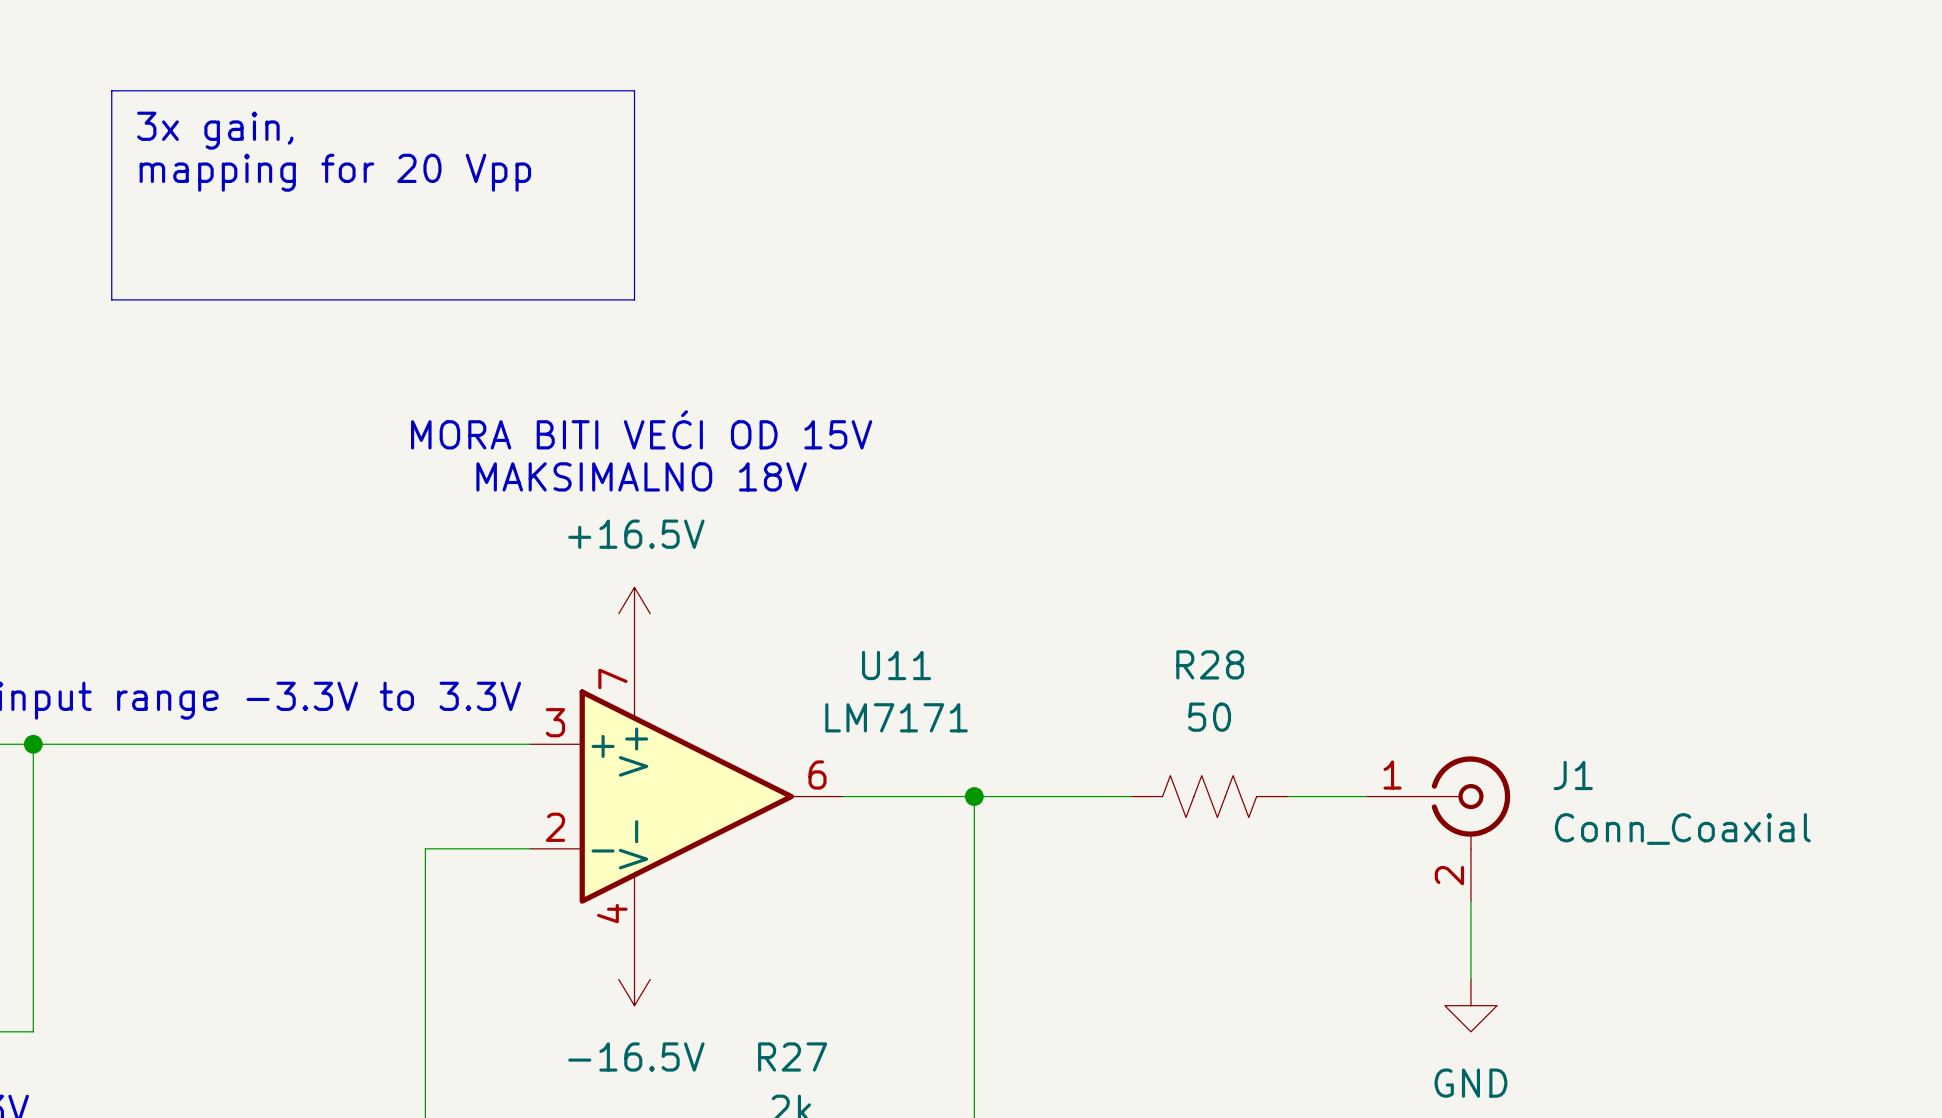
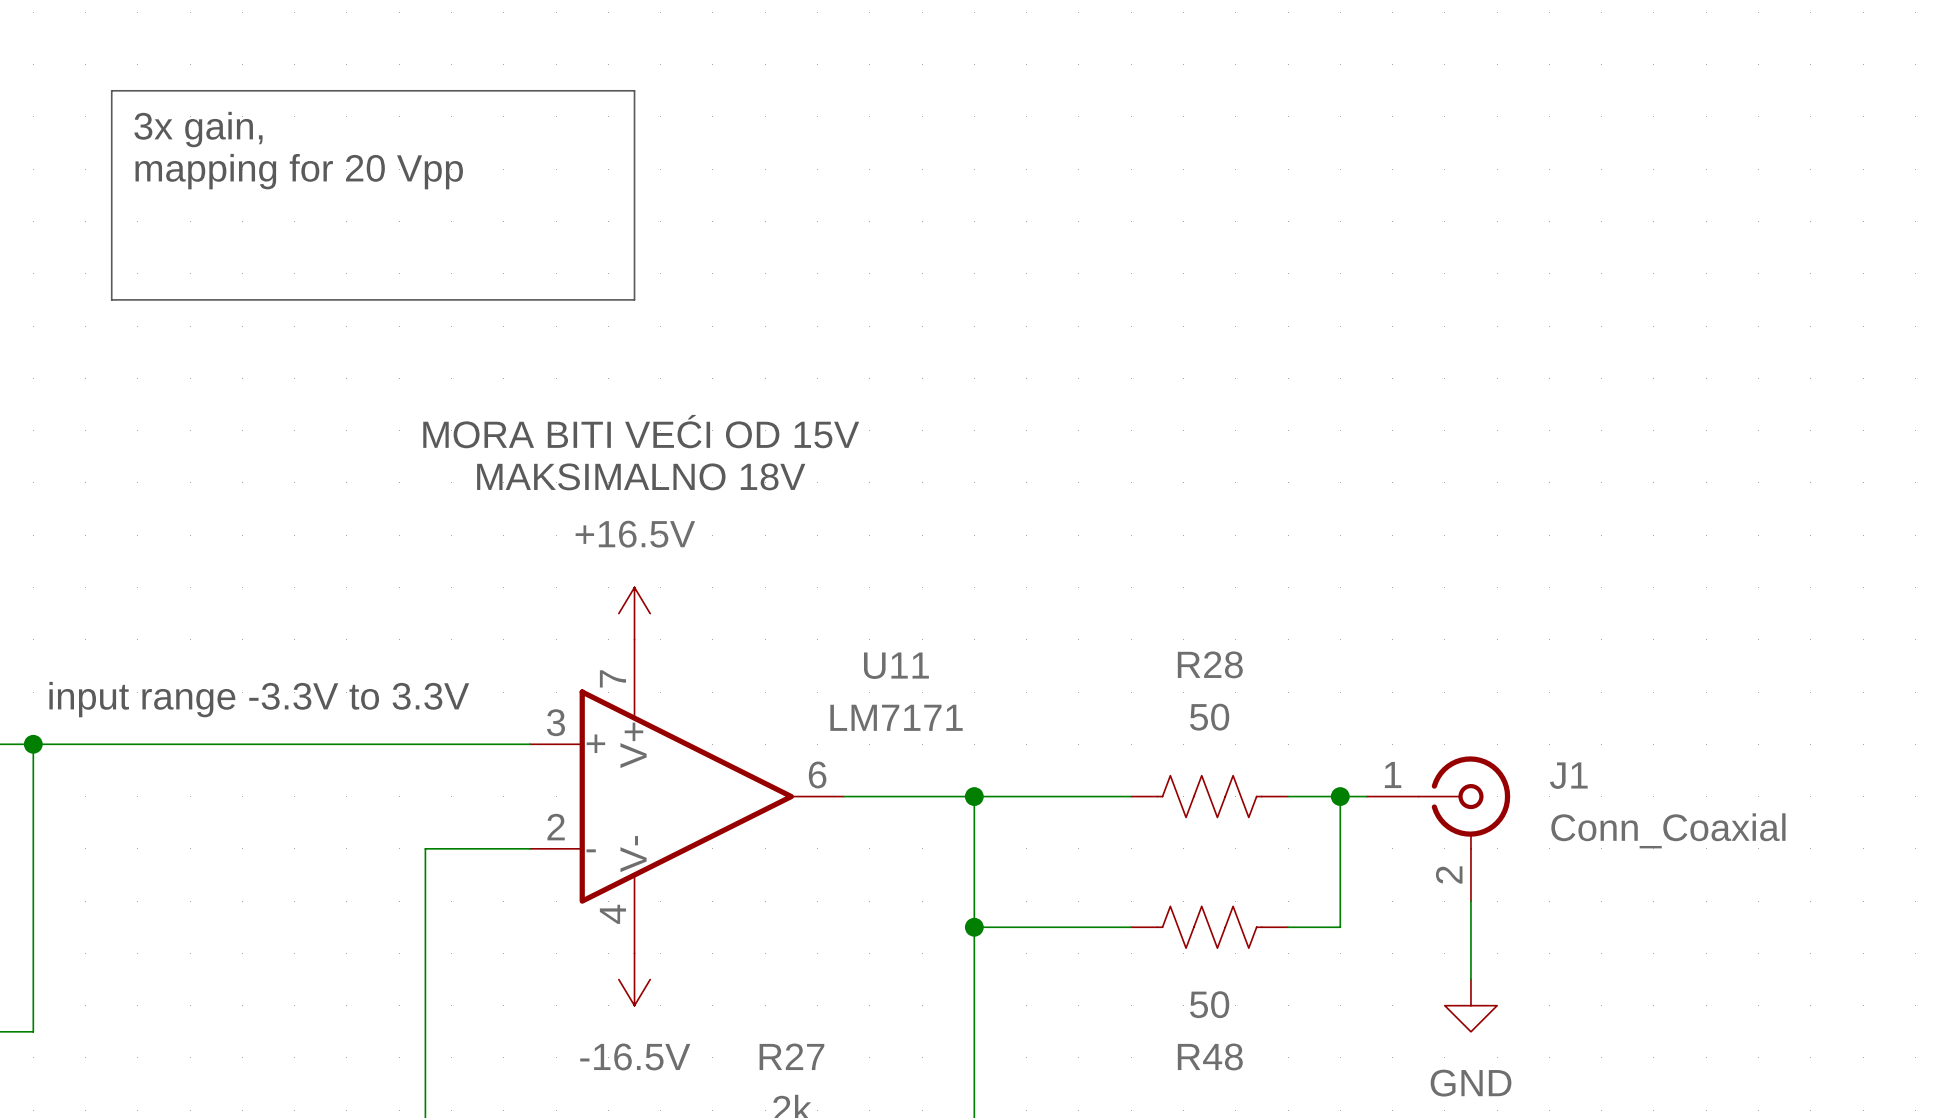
wire: none -> (1340, 796) (1340, 927) (1288, 927)
junction: none -> (1340, 796)
wire: none -> (974, 927) (1131, 927)
junction: none -> (974, 927)
R48: none -> 50 (1209, 927)

